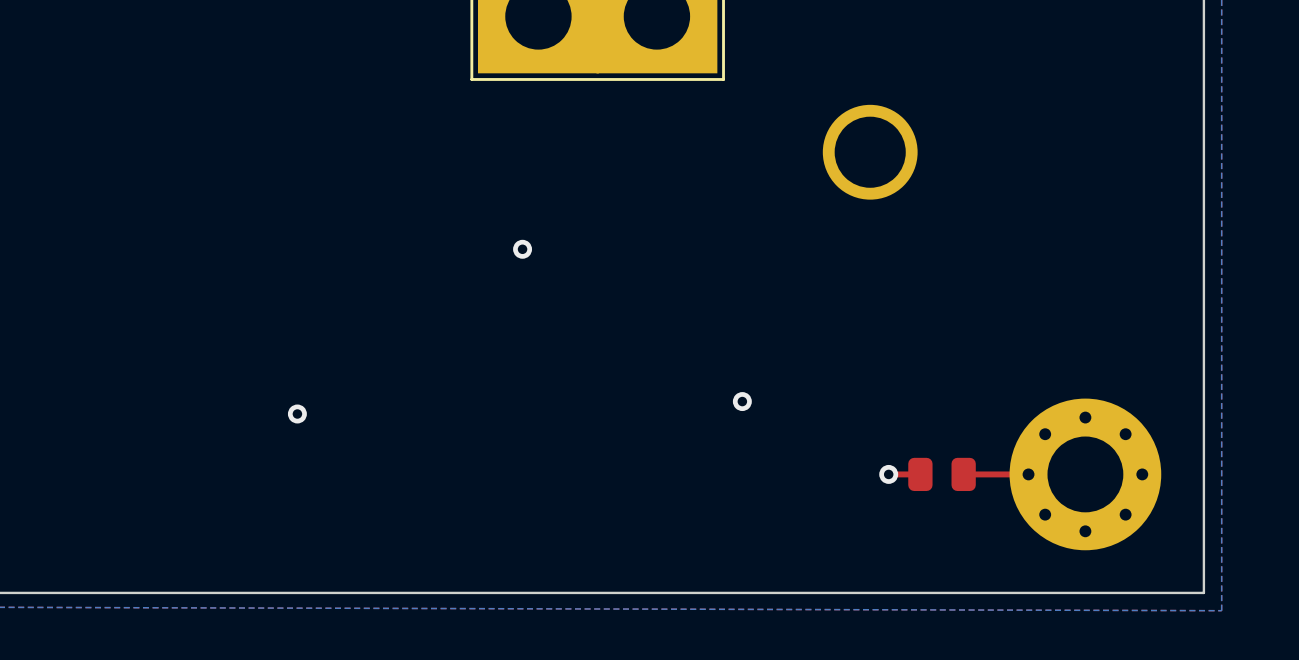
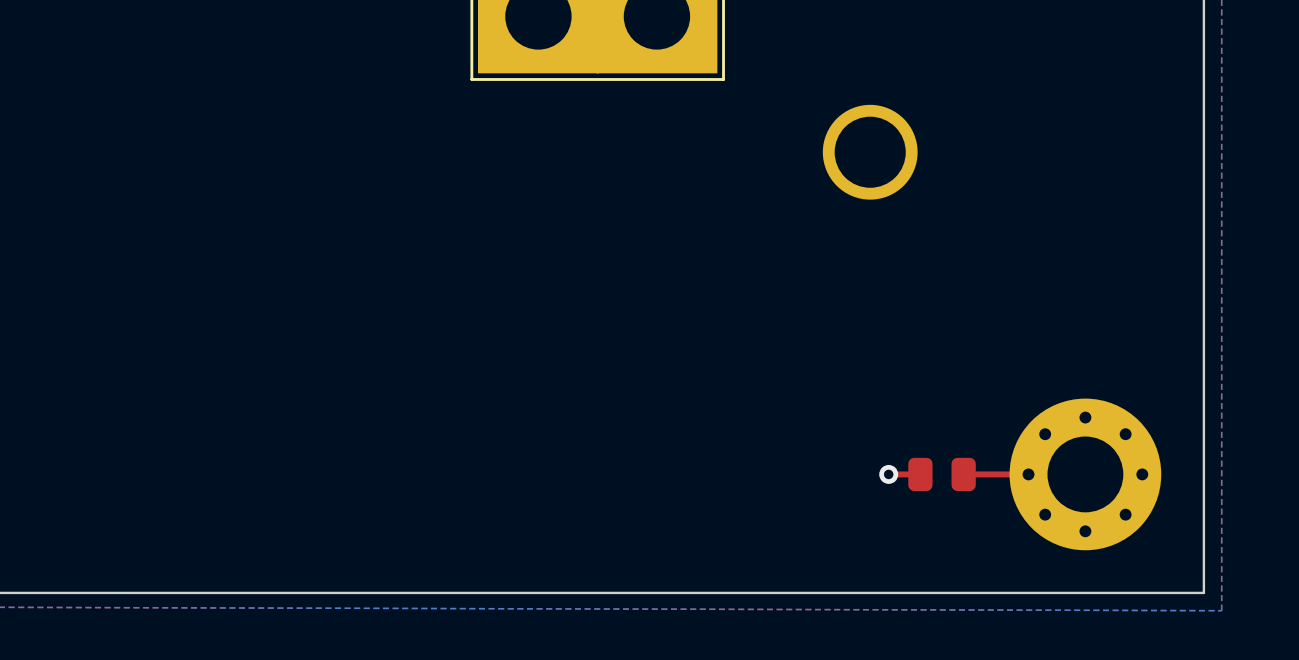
via: (522, 249) -> none
via: (742, 401) -> none
via: (297, 413) -> none

